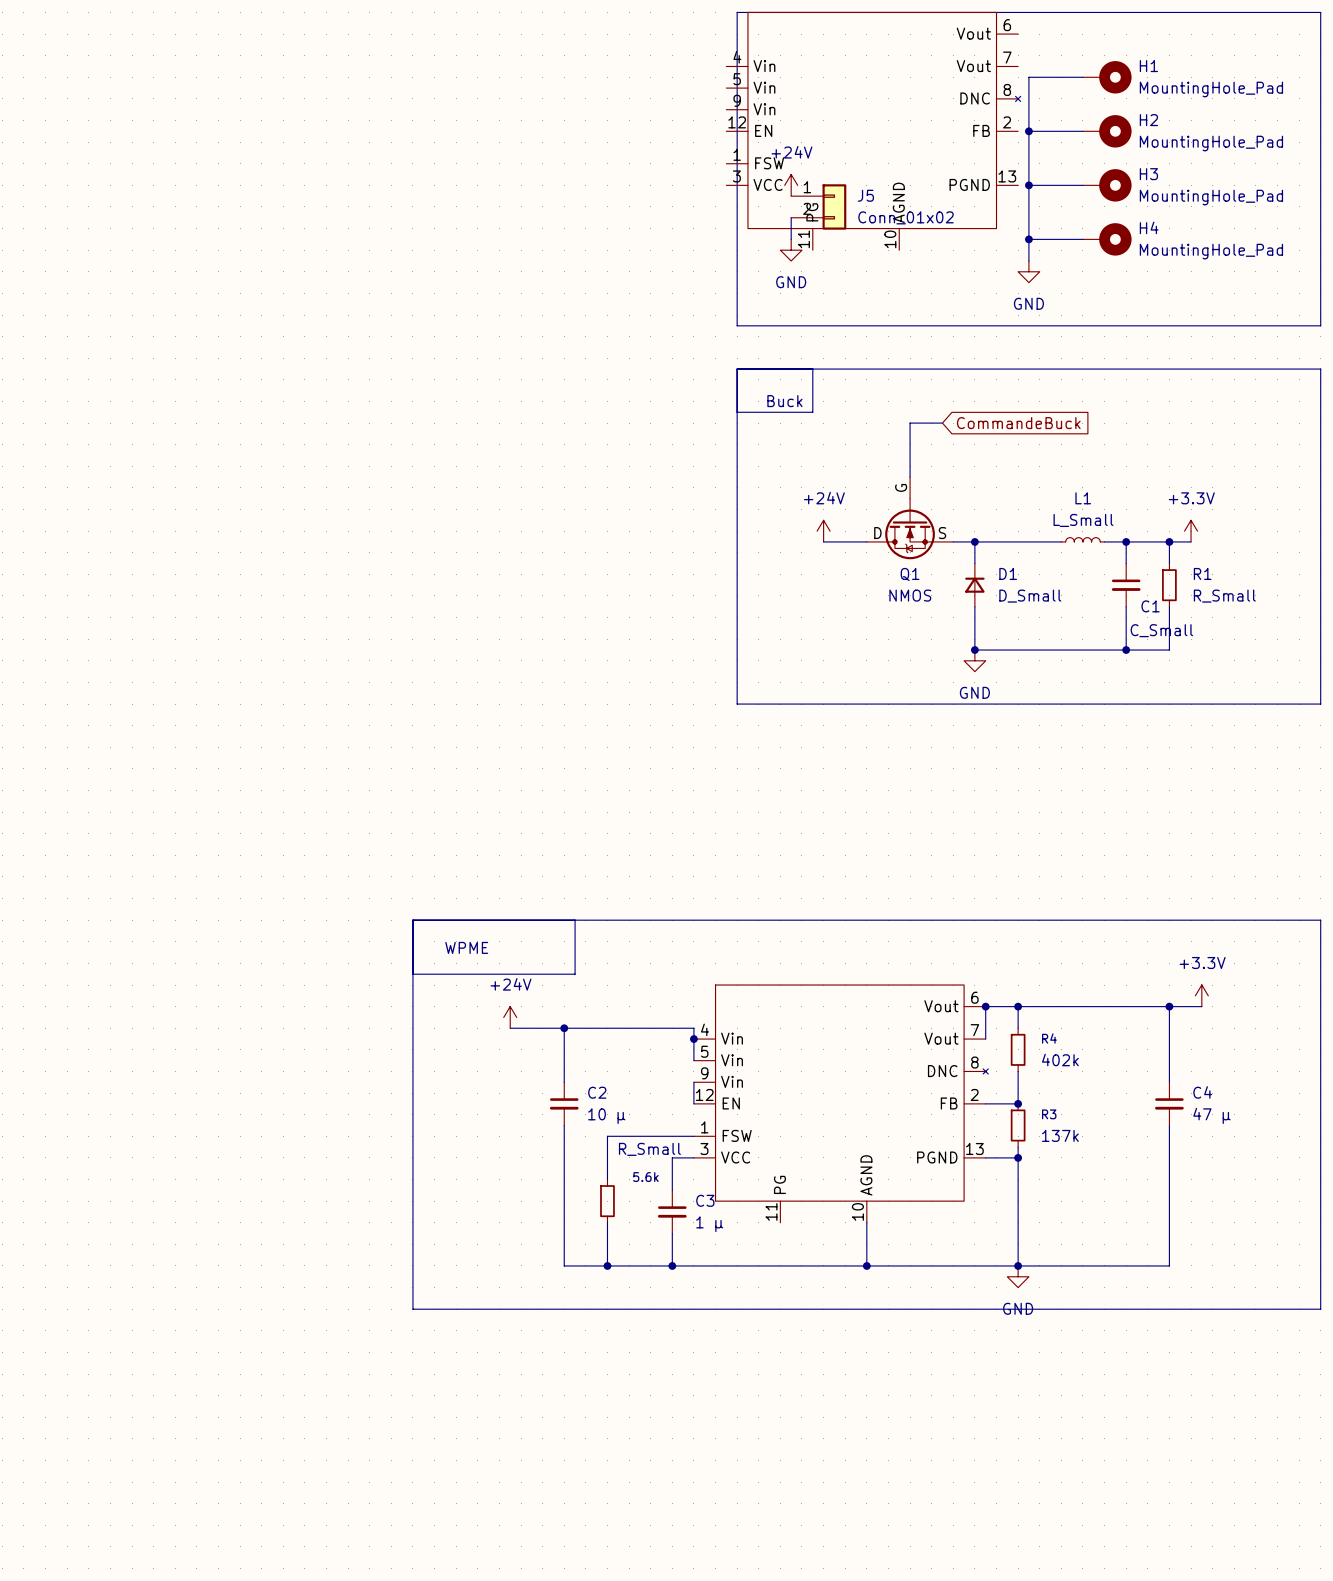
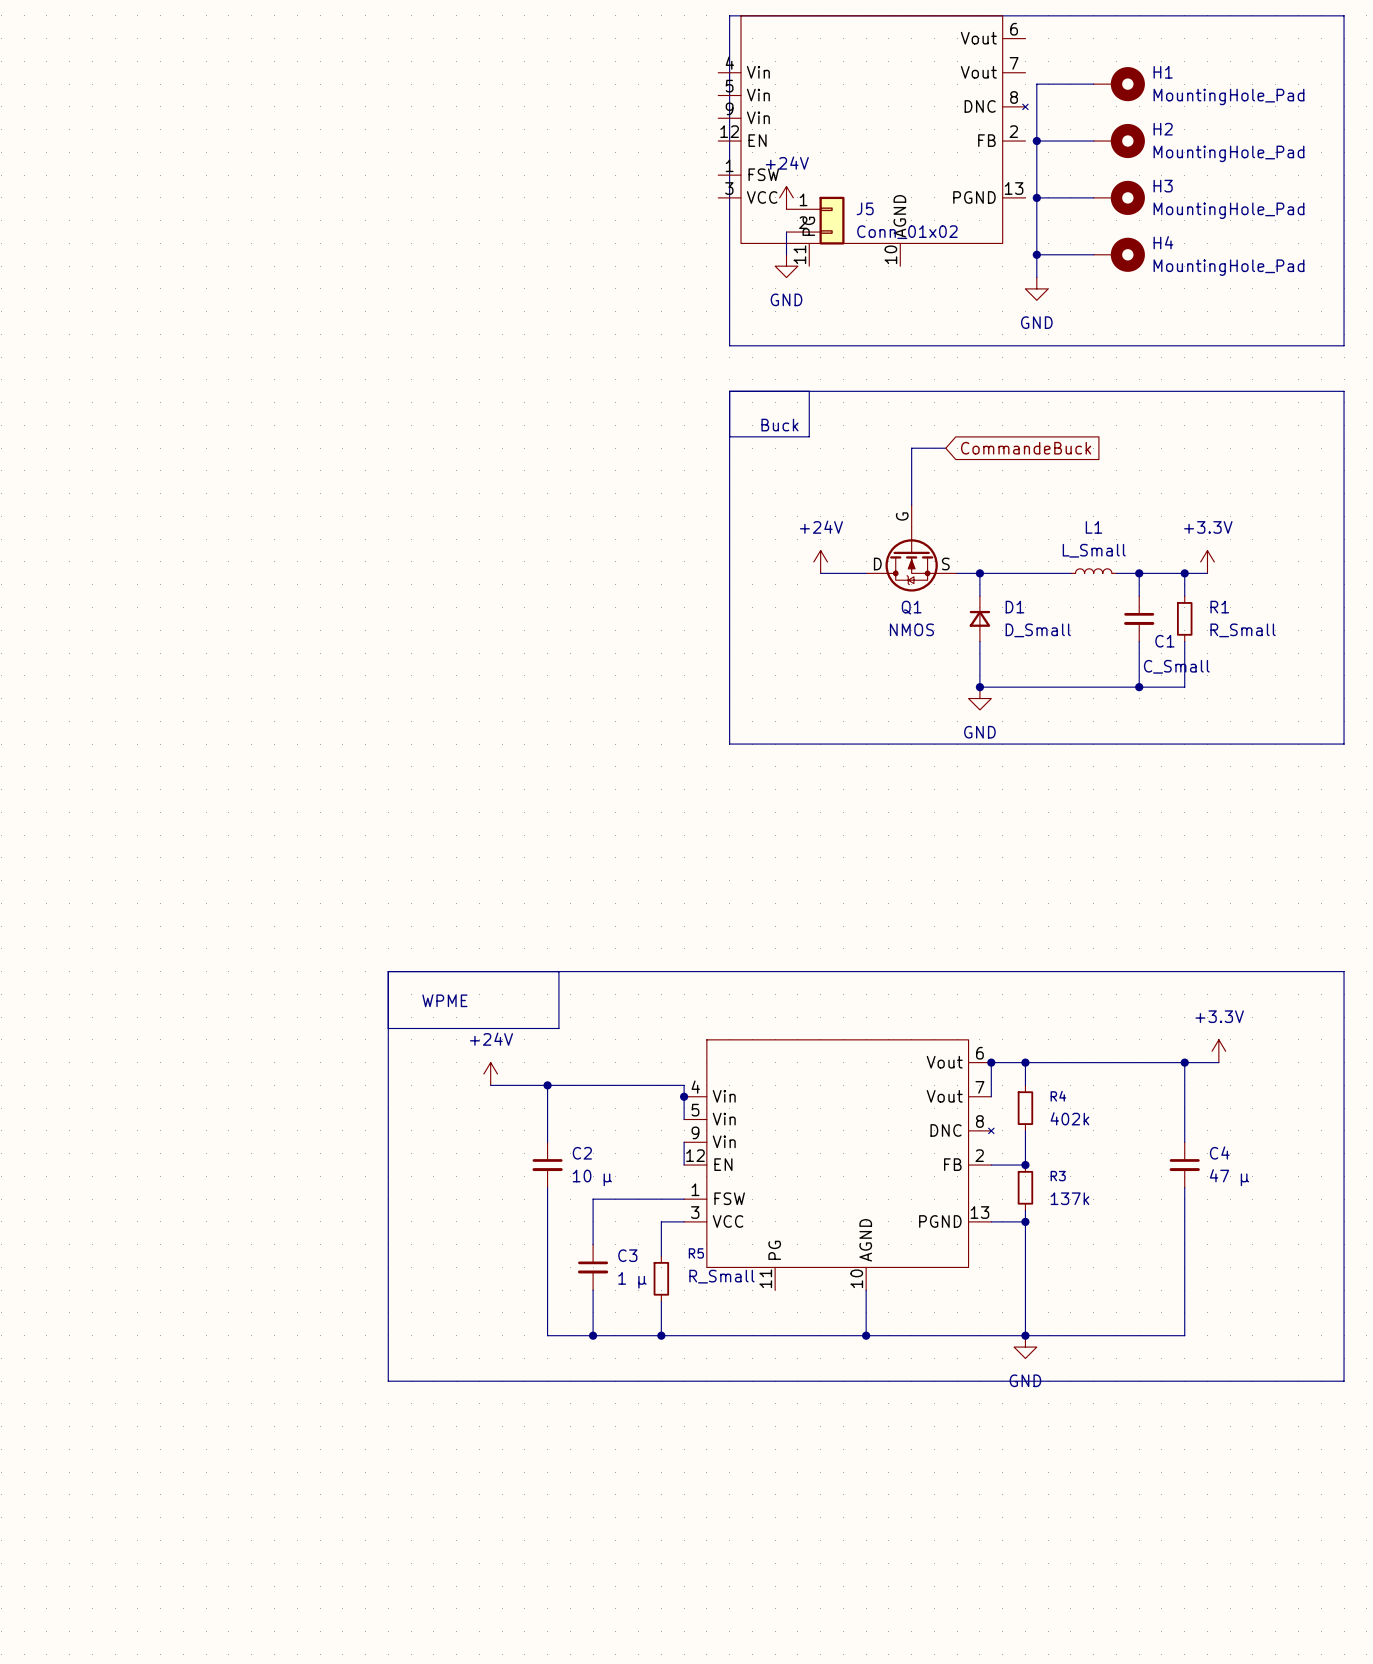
5.6k: R_Small (607, 1201) -> none
C3 position: (672, 1211) -> (593, 1267)
R5: none -> R_Small (661, 1278)

